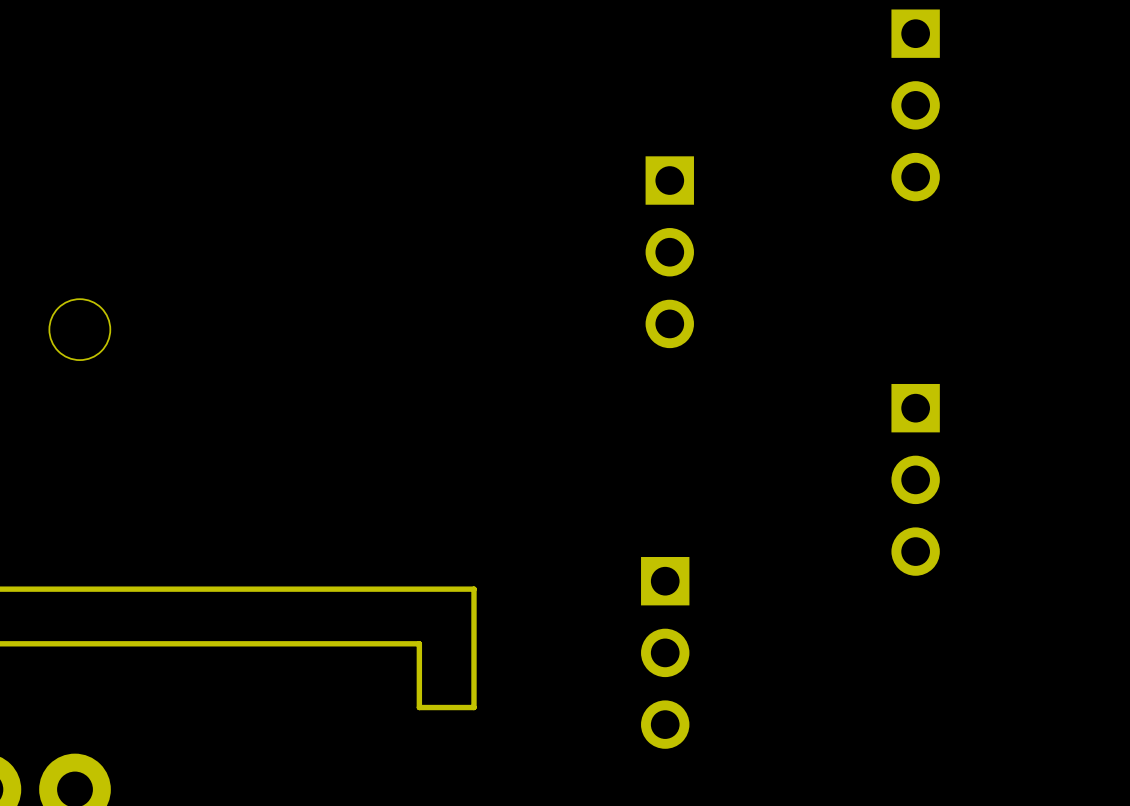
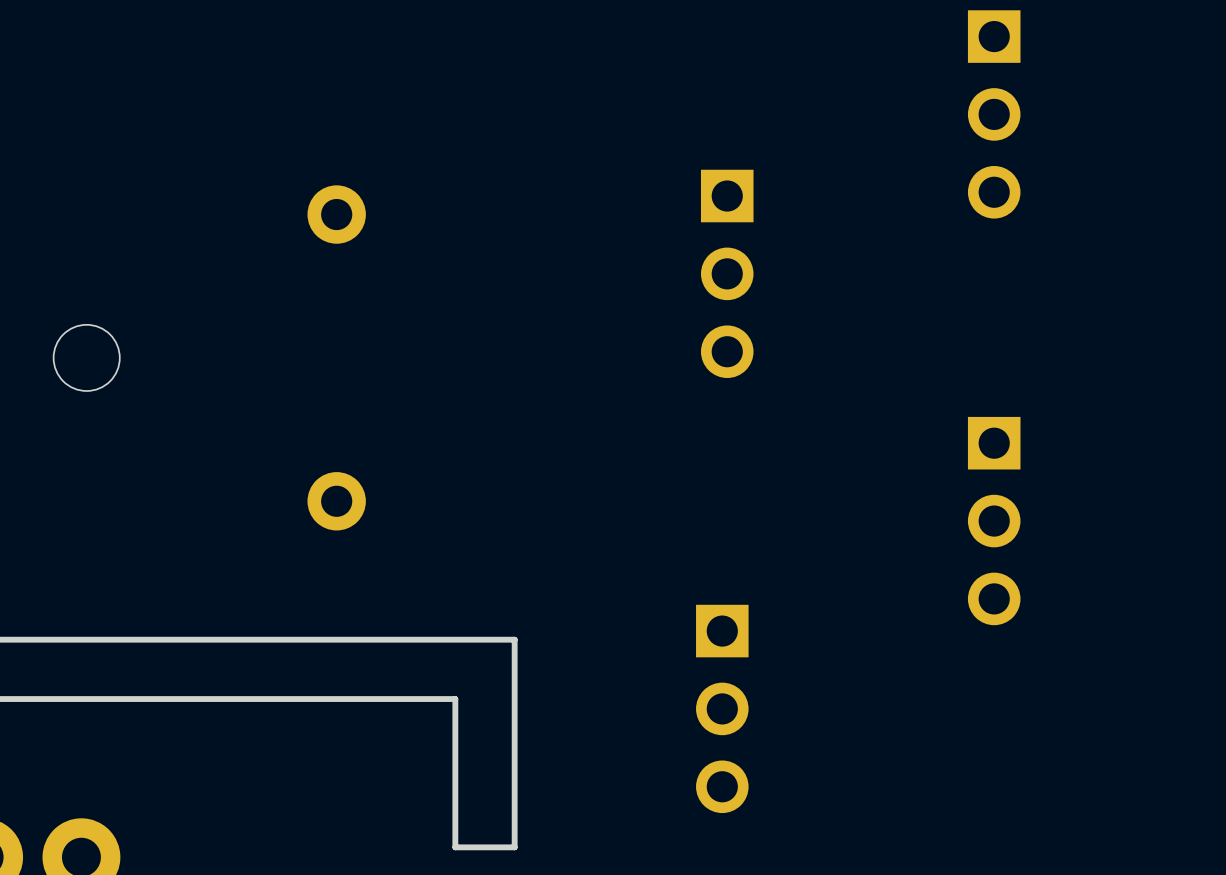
part: none -> (336, 214)
part: none -> (336, 501)
board edge: (473, 707) (419, 707) -> (514, 768) (514, 847) (455, 847) (455, 768)

